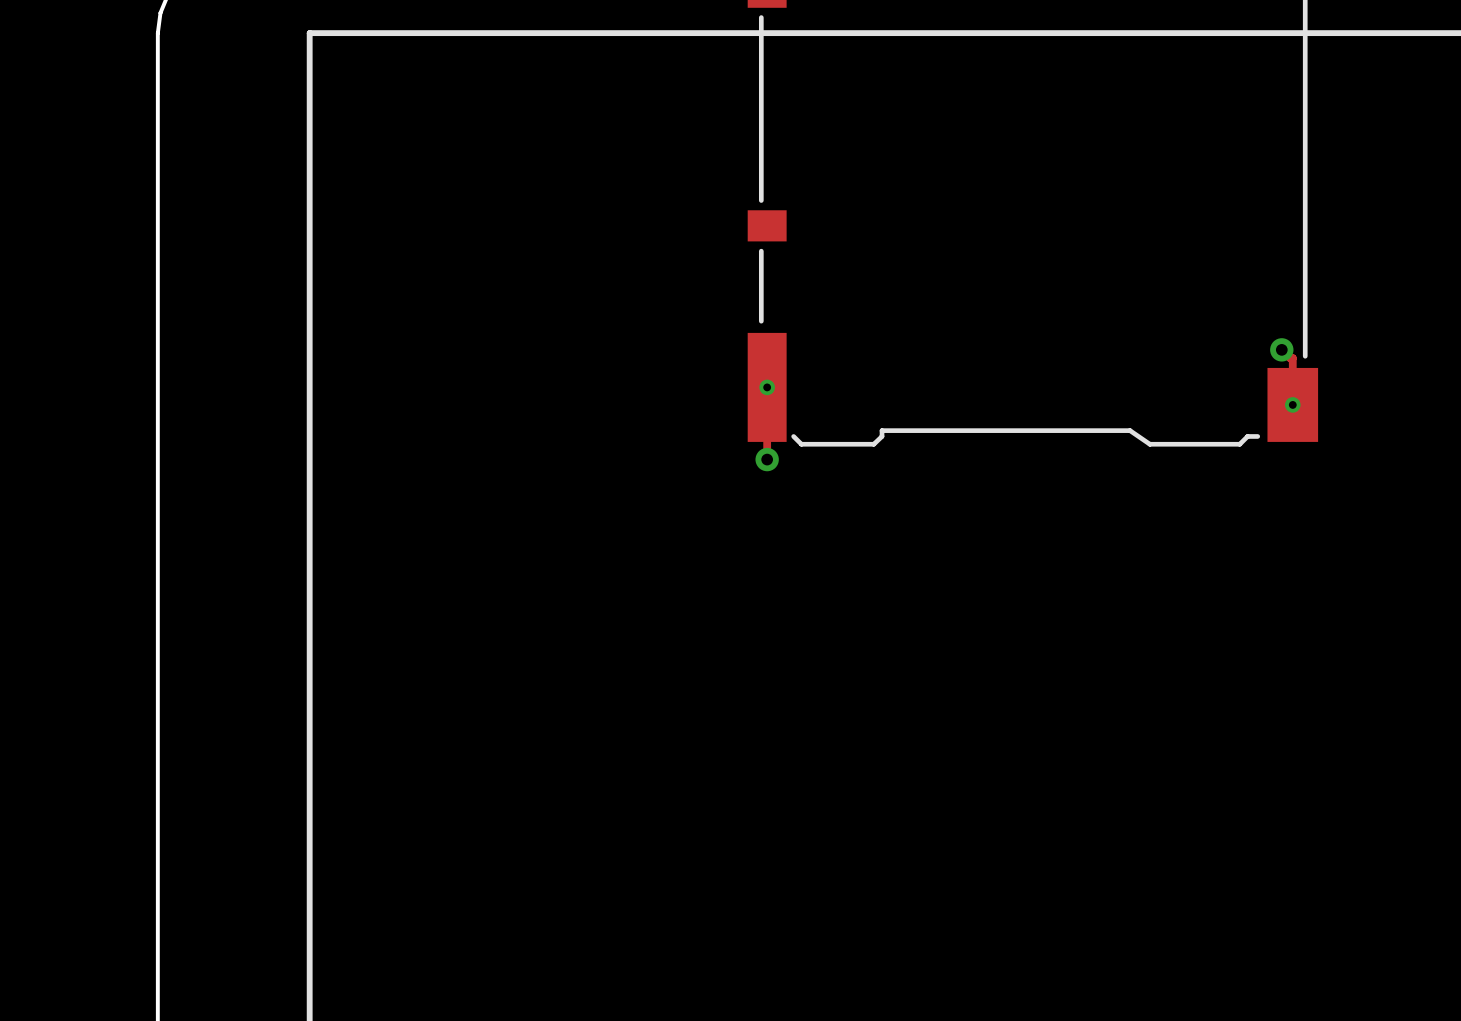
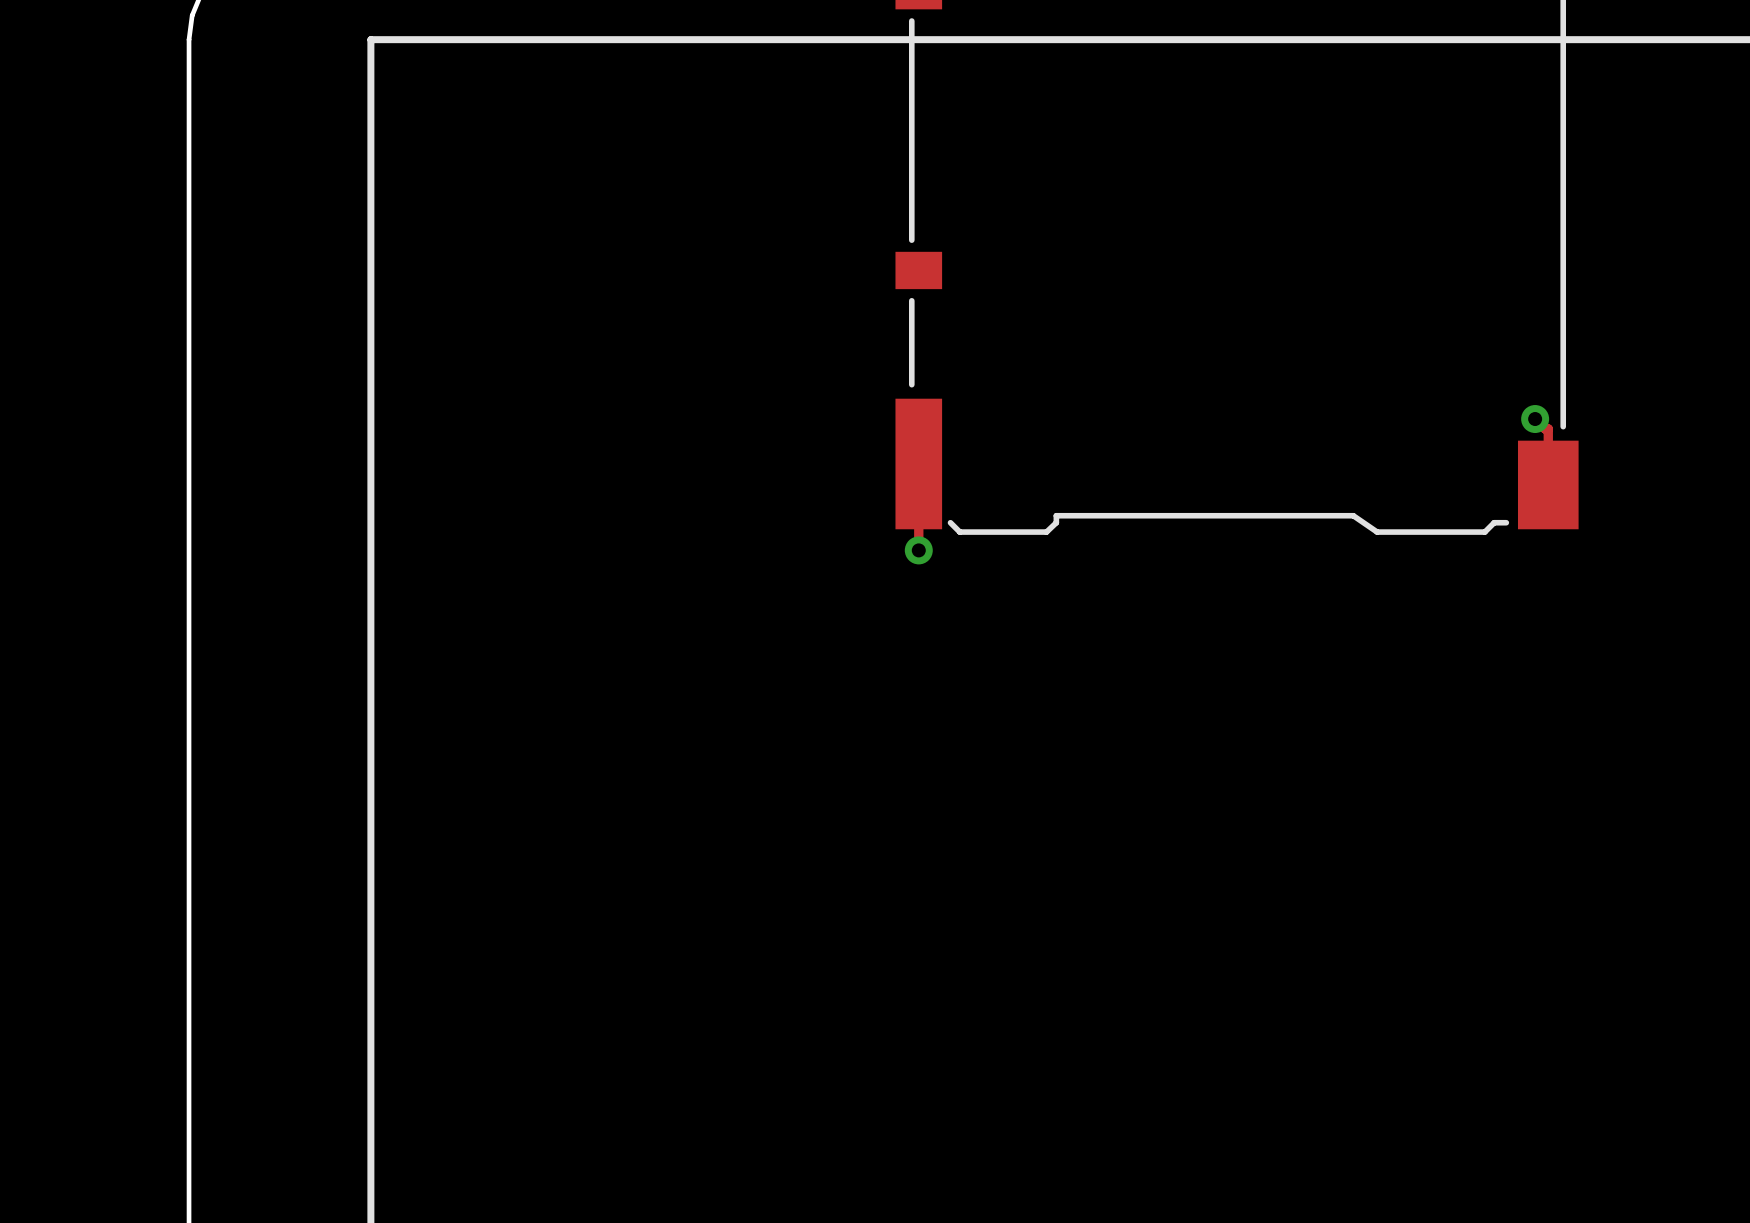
via: (767, 387) -> none
via: (1292, 404) -> none

